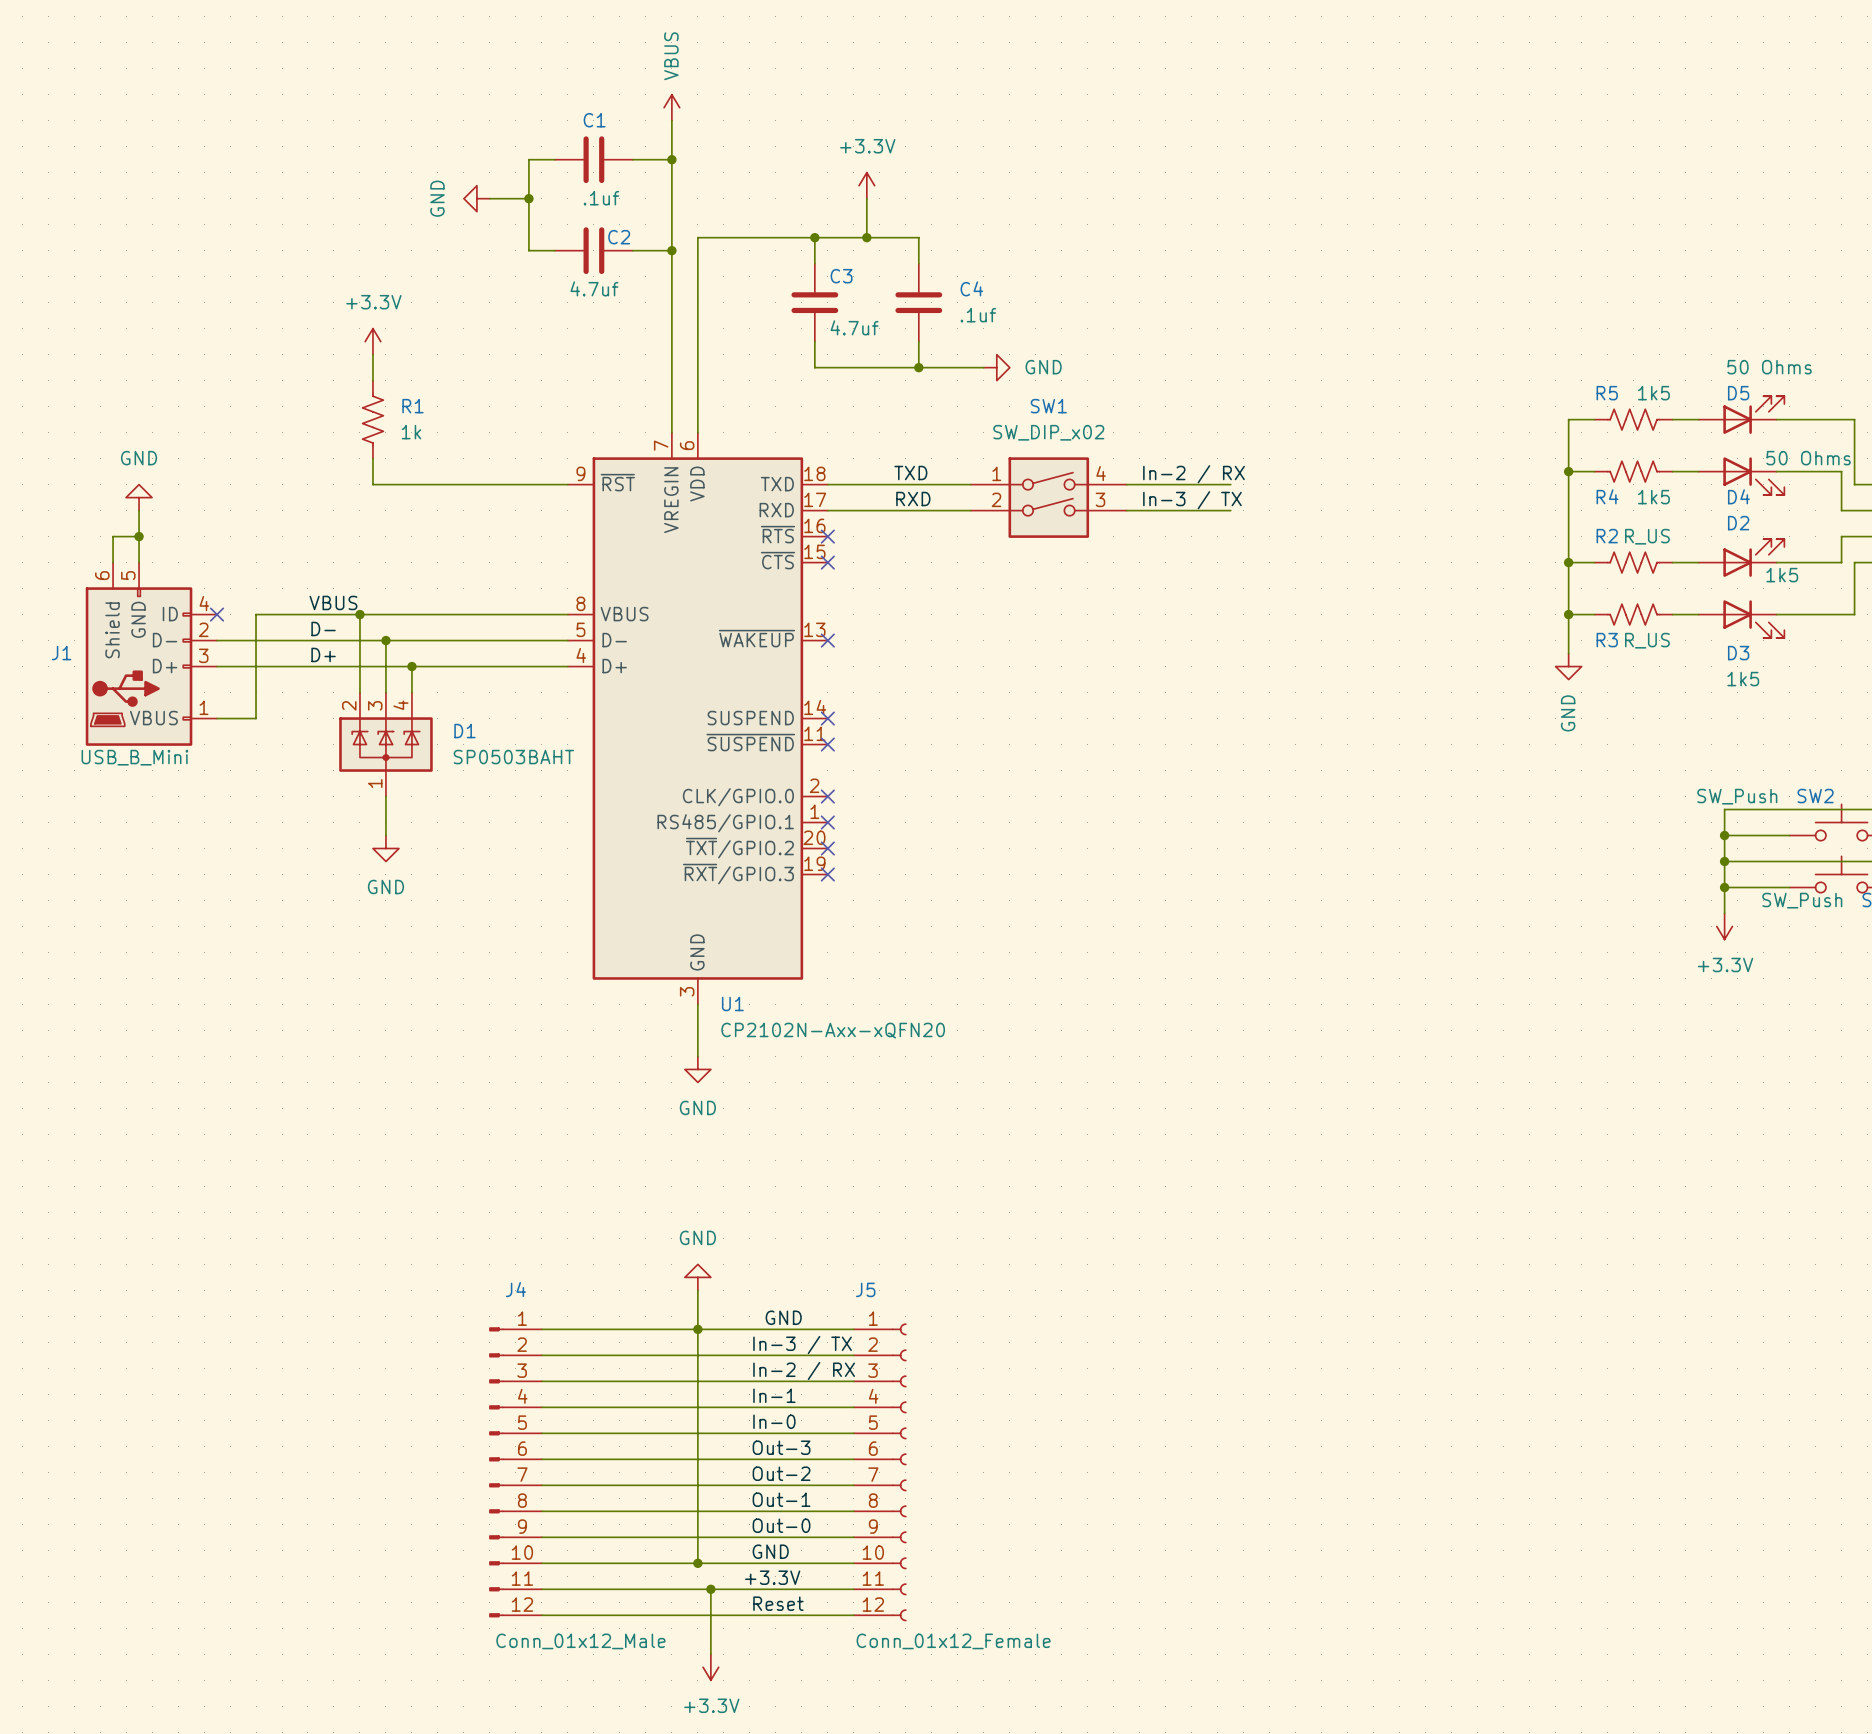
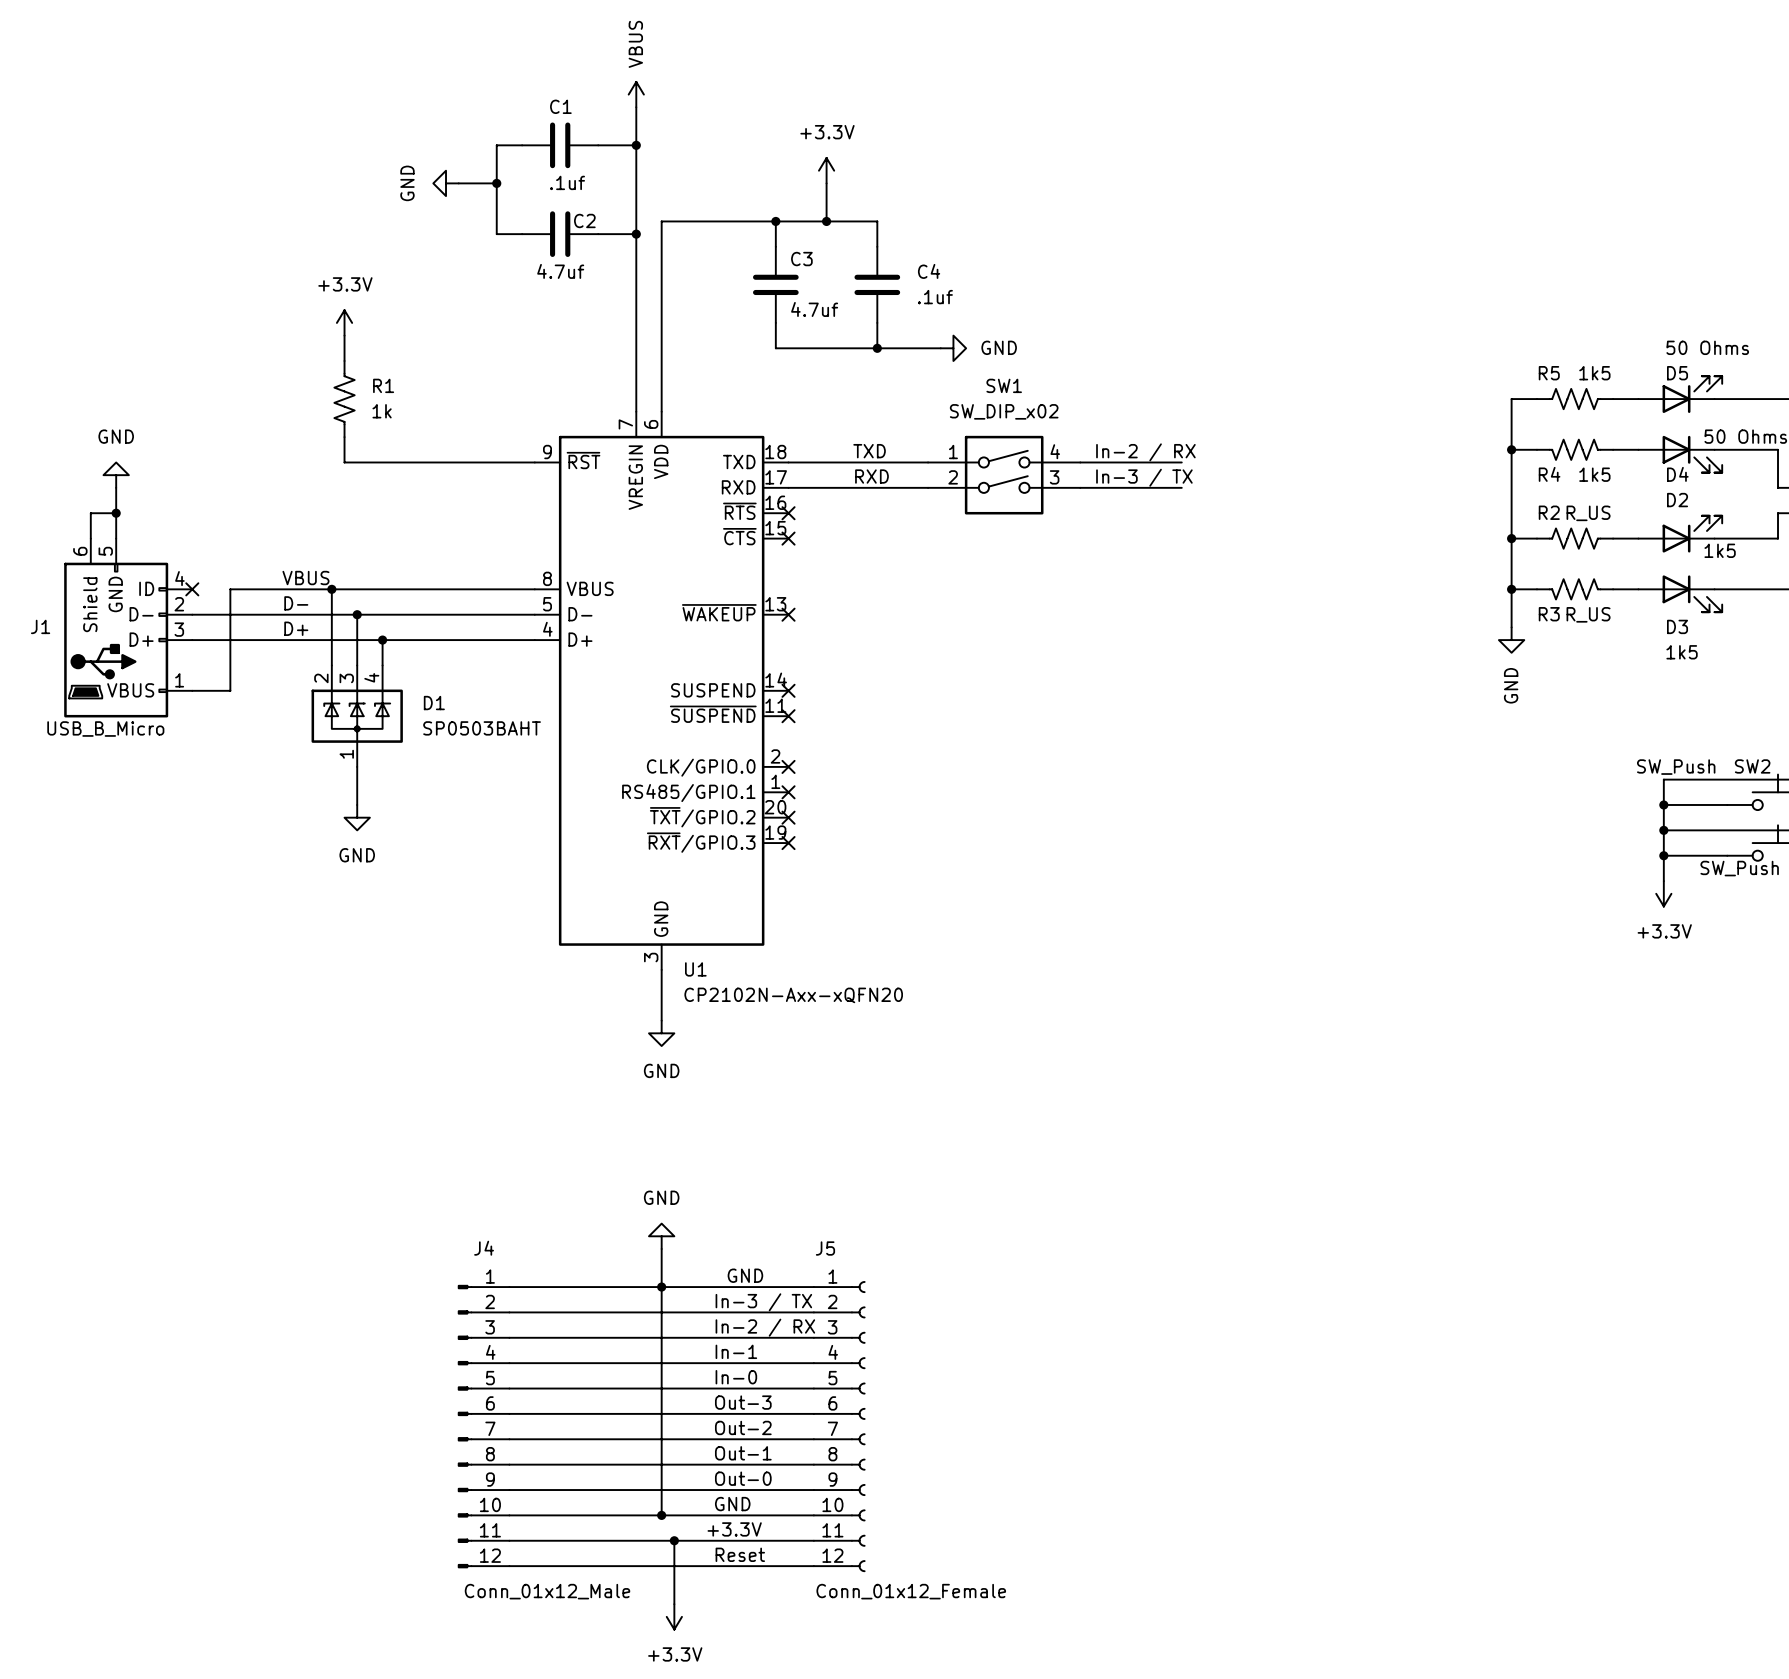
J1 value: USB_B_Mini (134, 757) -> USB_B_Micro (105, 729)

